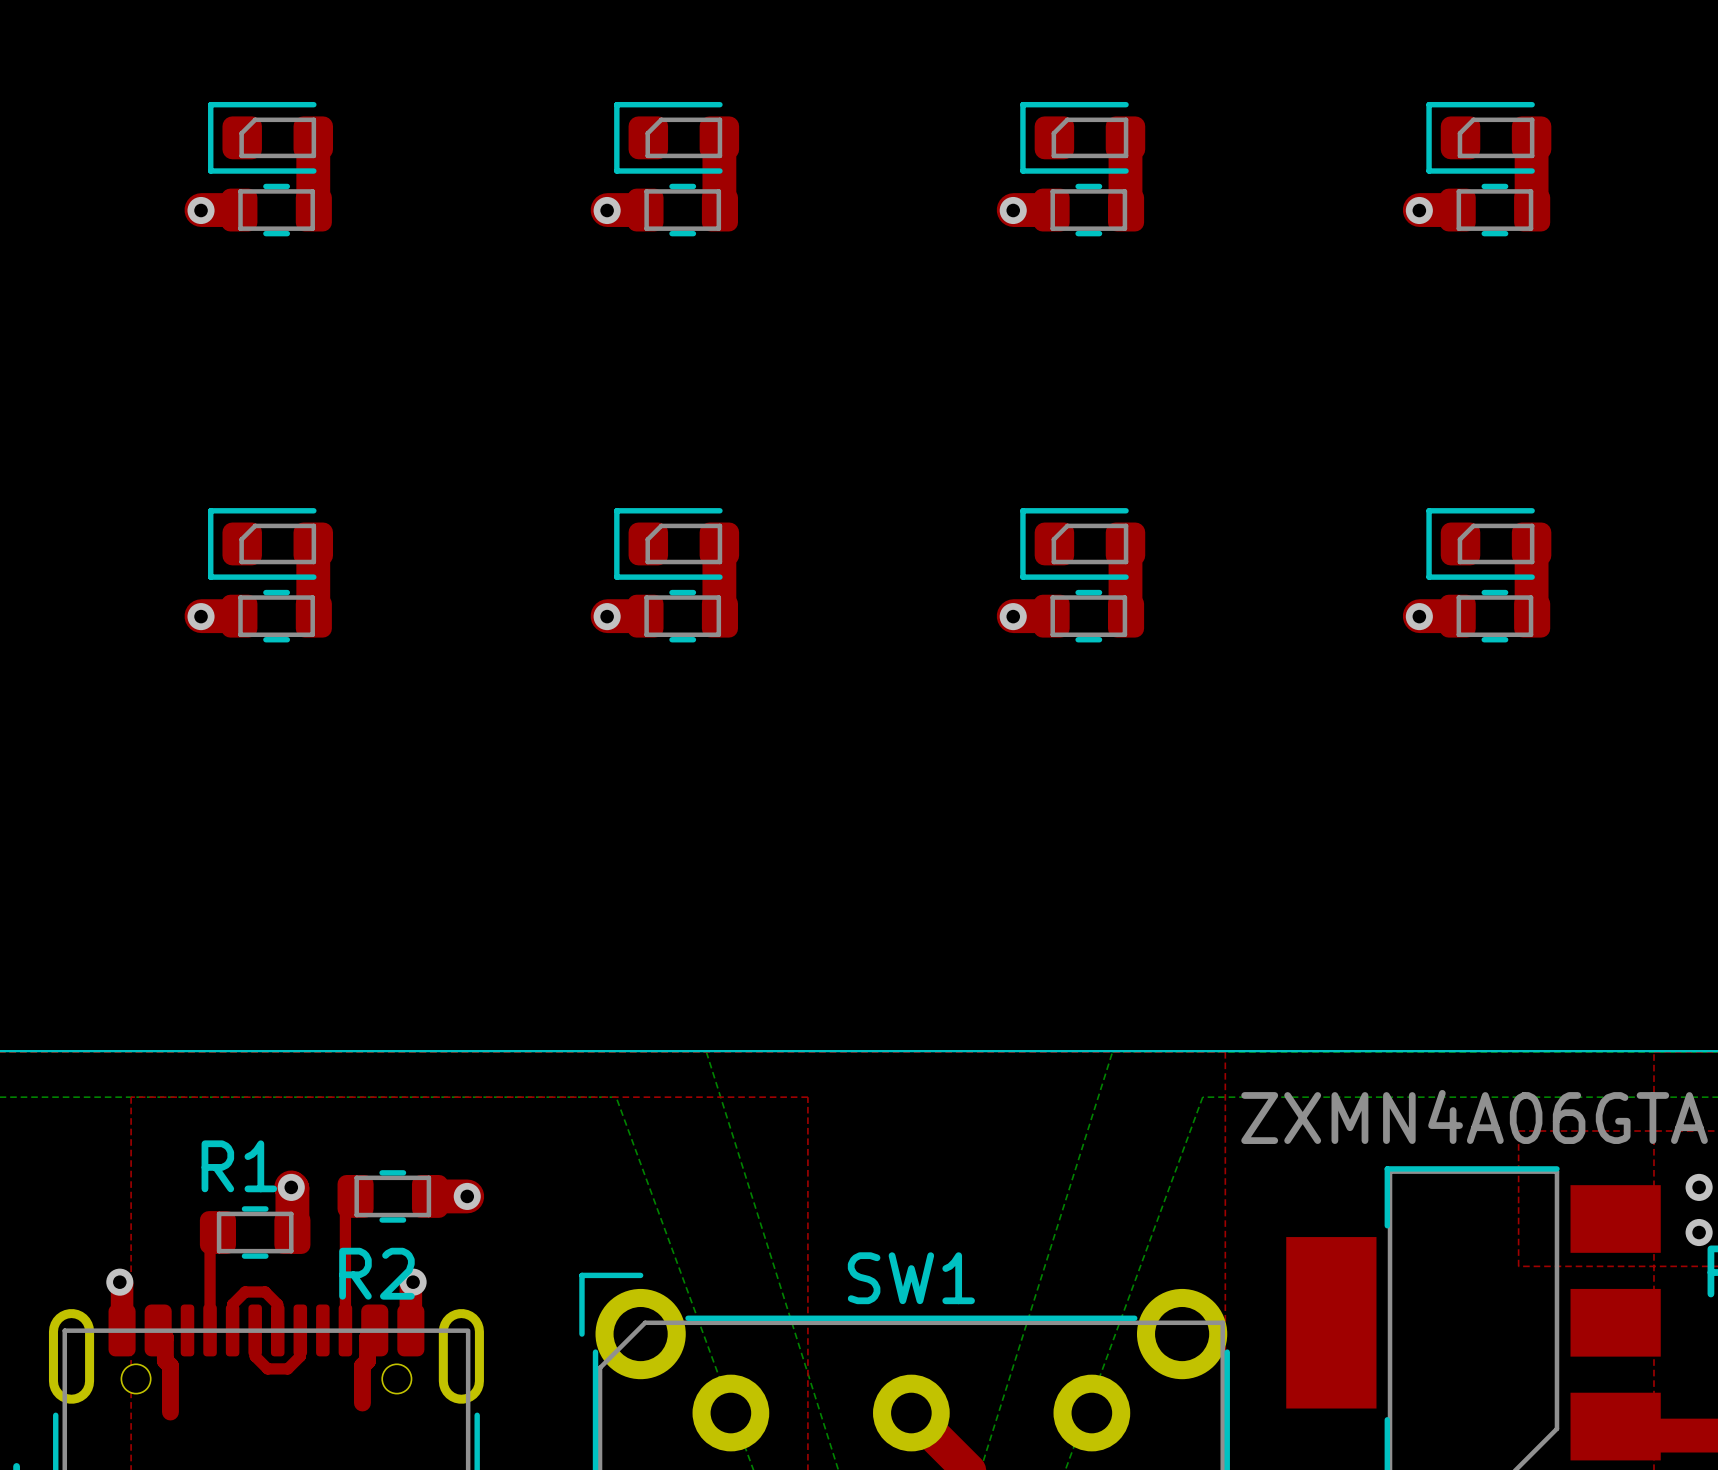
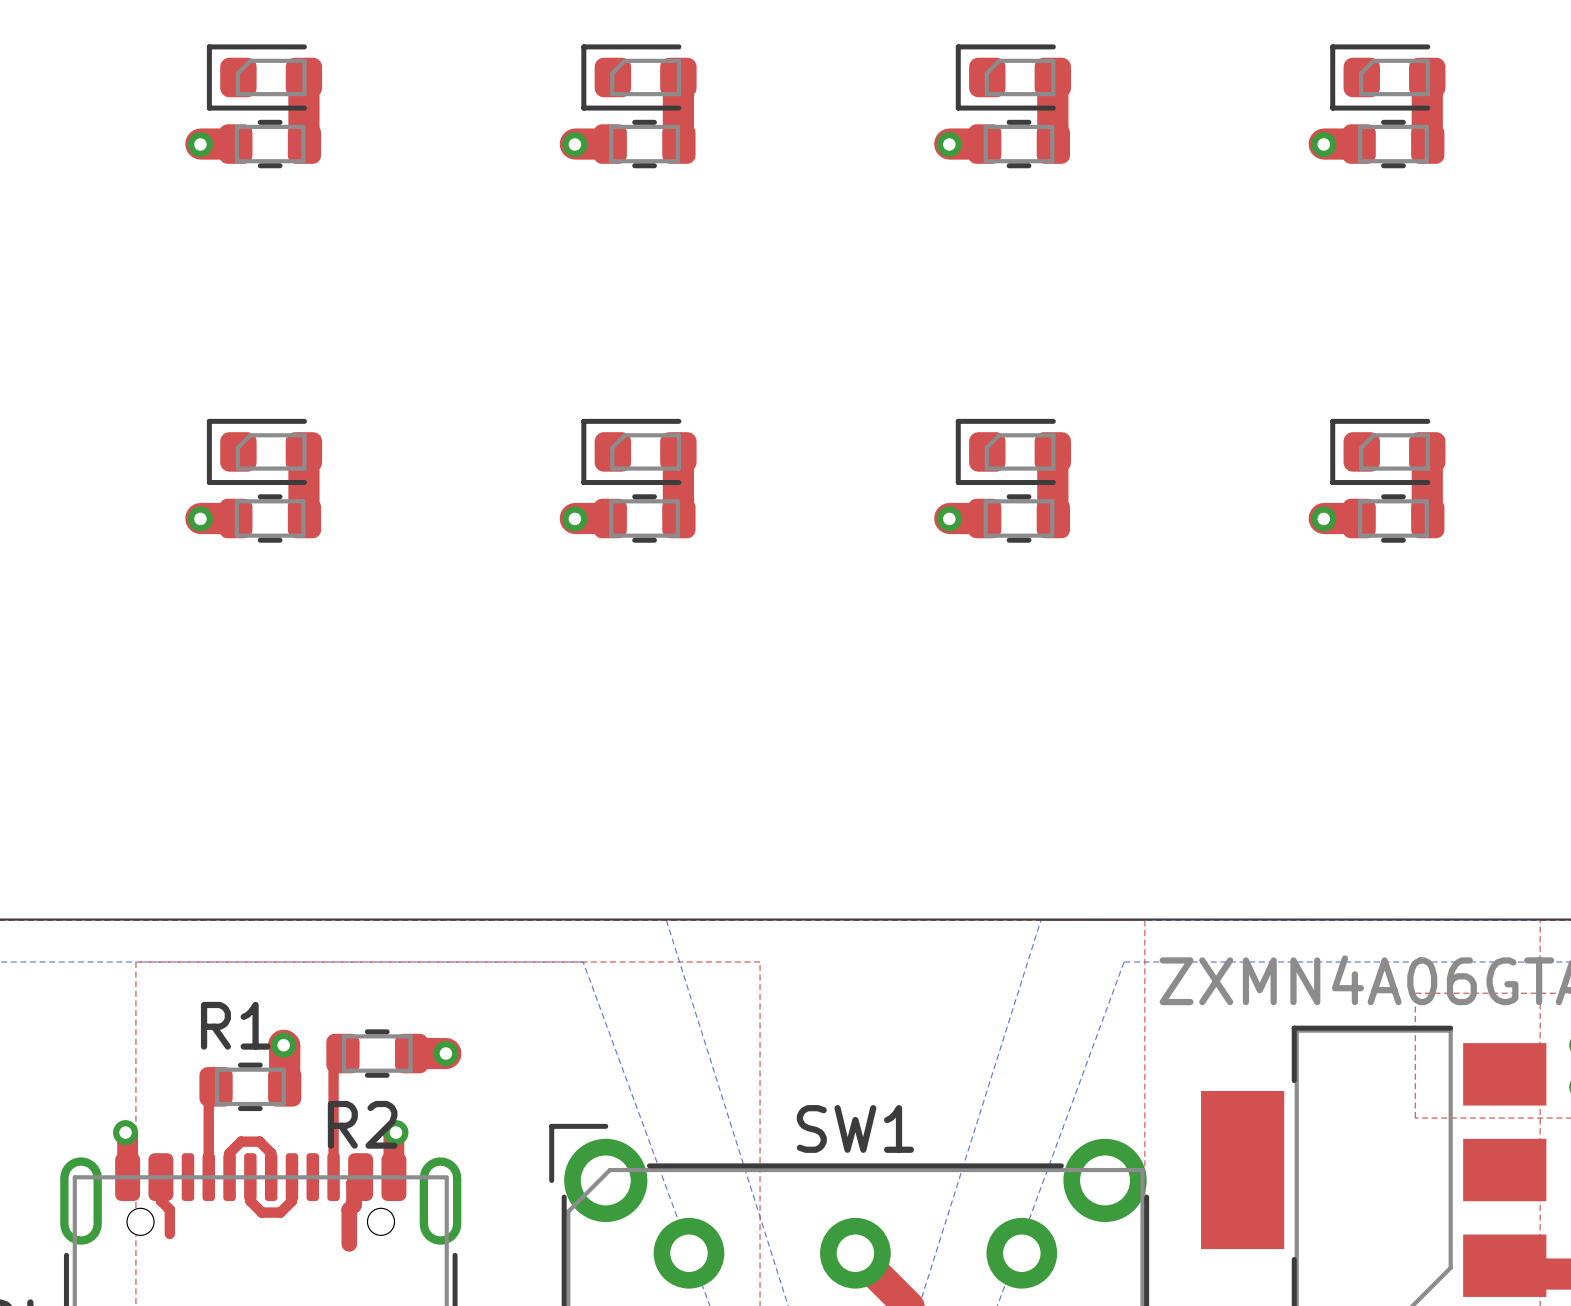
top track: (158, 1330) (165, 1337) (165, 1360) (170, 1365) (170, 1412) -> (160, 1177) (160, 1200) (169, 1209) (169, 1233)

